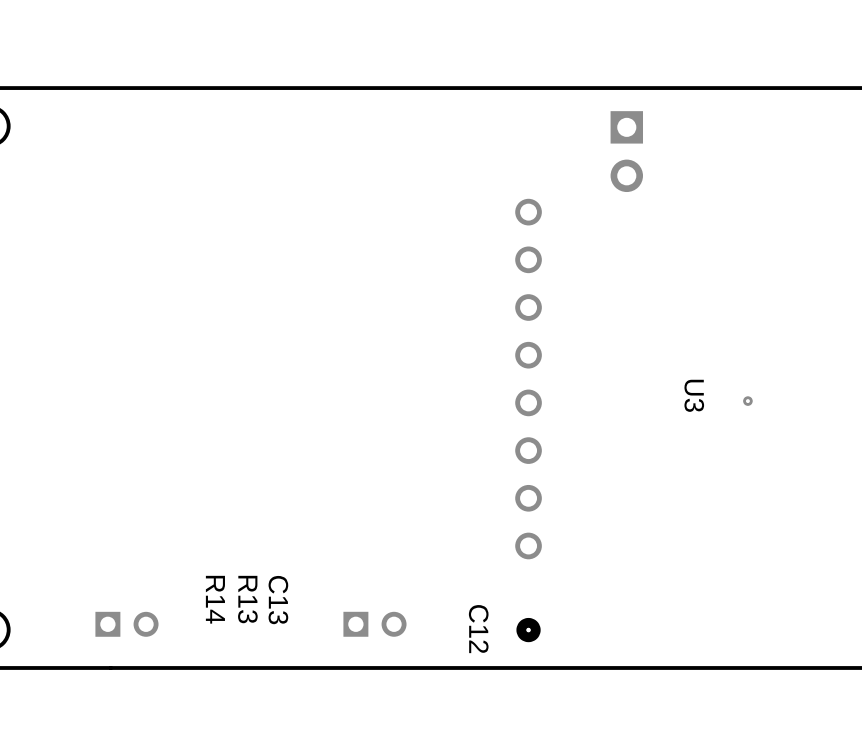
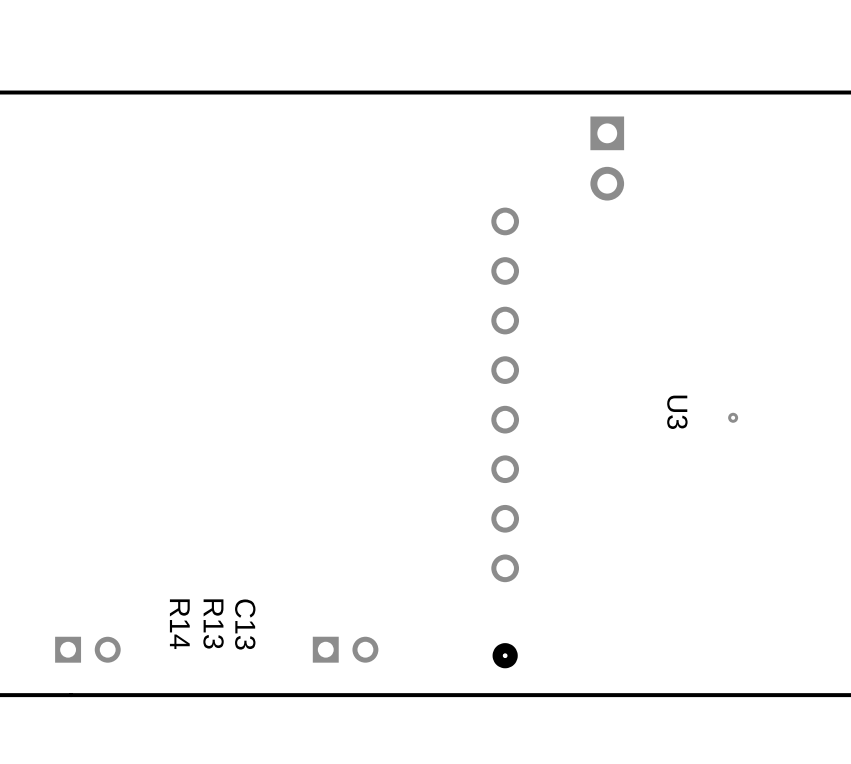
C12: (478, 629) -> none

